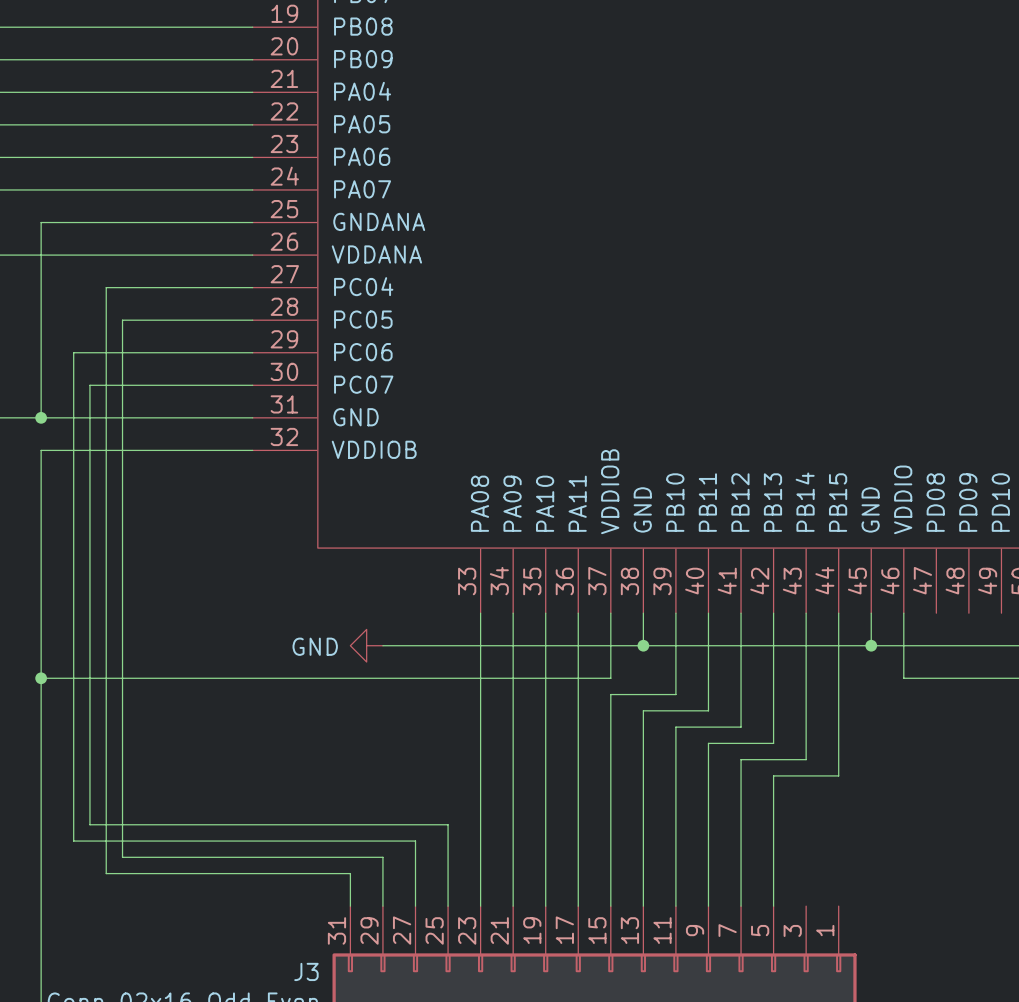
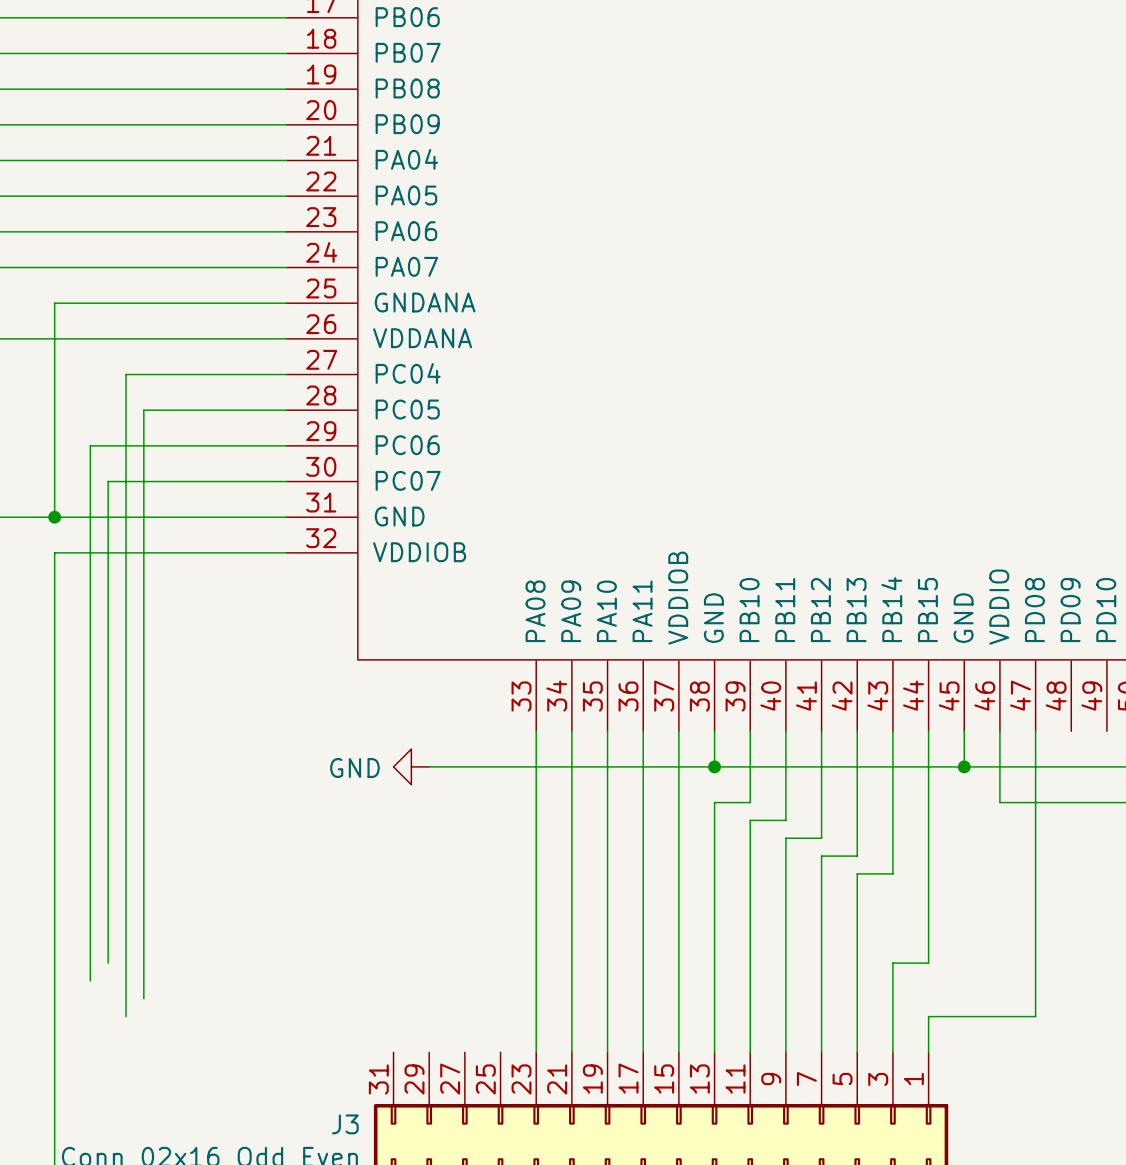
wire: none -> (1035, 731) (1035, 1016) (928, 1016) (928, 1052)
wire: (41, 678) (610, 678) -> none
junction: (41, 678) -> none
wire: (675, 678) (675, 694) (610, 694) -> (678, 802) (678, 820)
wire: (708, 694) (708, 710) (643, 710) -> (750, 802) (714, 802) (714, 838)
wire: none -> (785, 820) (750, 820) (750, 856)
wire: (741, 710) (741, 727) (675, 727) -> (821, 838) (785, 838) (785, 873)
wire: (773, 727) (773, 743) (708, 743) -> none
wire: (806, 743) (806, 759) (741, 759) -> (857, 856) (821, 856) (821, 891)
wire: (773, 775) (838, 775) -> (857, 909) (857, 873) (892, 873)
wire: none -> (928, 909) (928, 963) (892, 963) (892, 1052)
wire: (89, 824) (448, 824) (448, 906) -> none
wire: (73, 841) (415, 841) (415, 906) -> none
wire: (122, 857) (382, 857) (382, 906) -> none
wire: (106, 873) (350, 873) (350, 906) -> none

